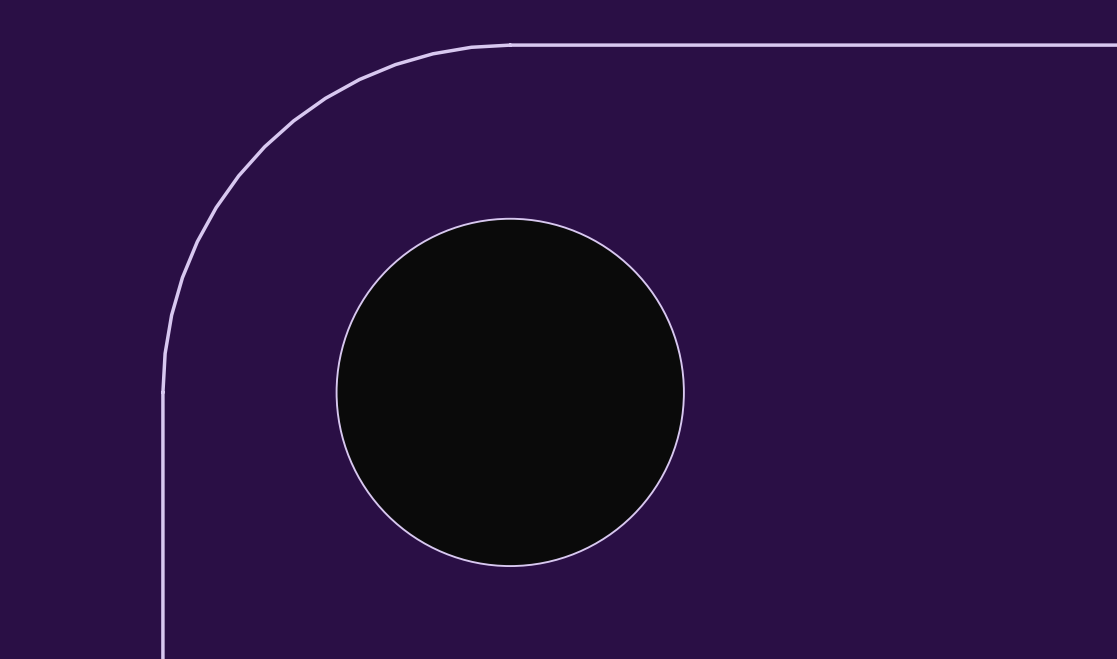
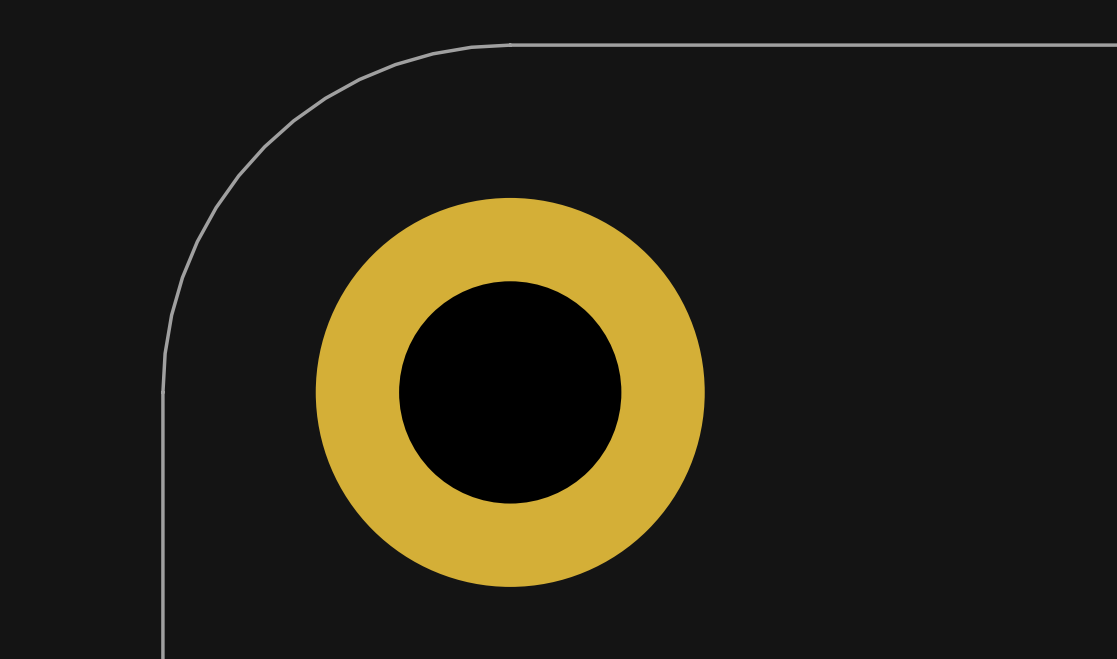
part footprint: [336, 218, 684, 567] -> [315, 197, 705, 587]

